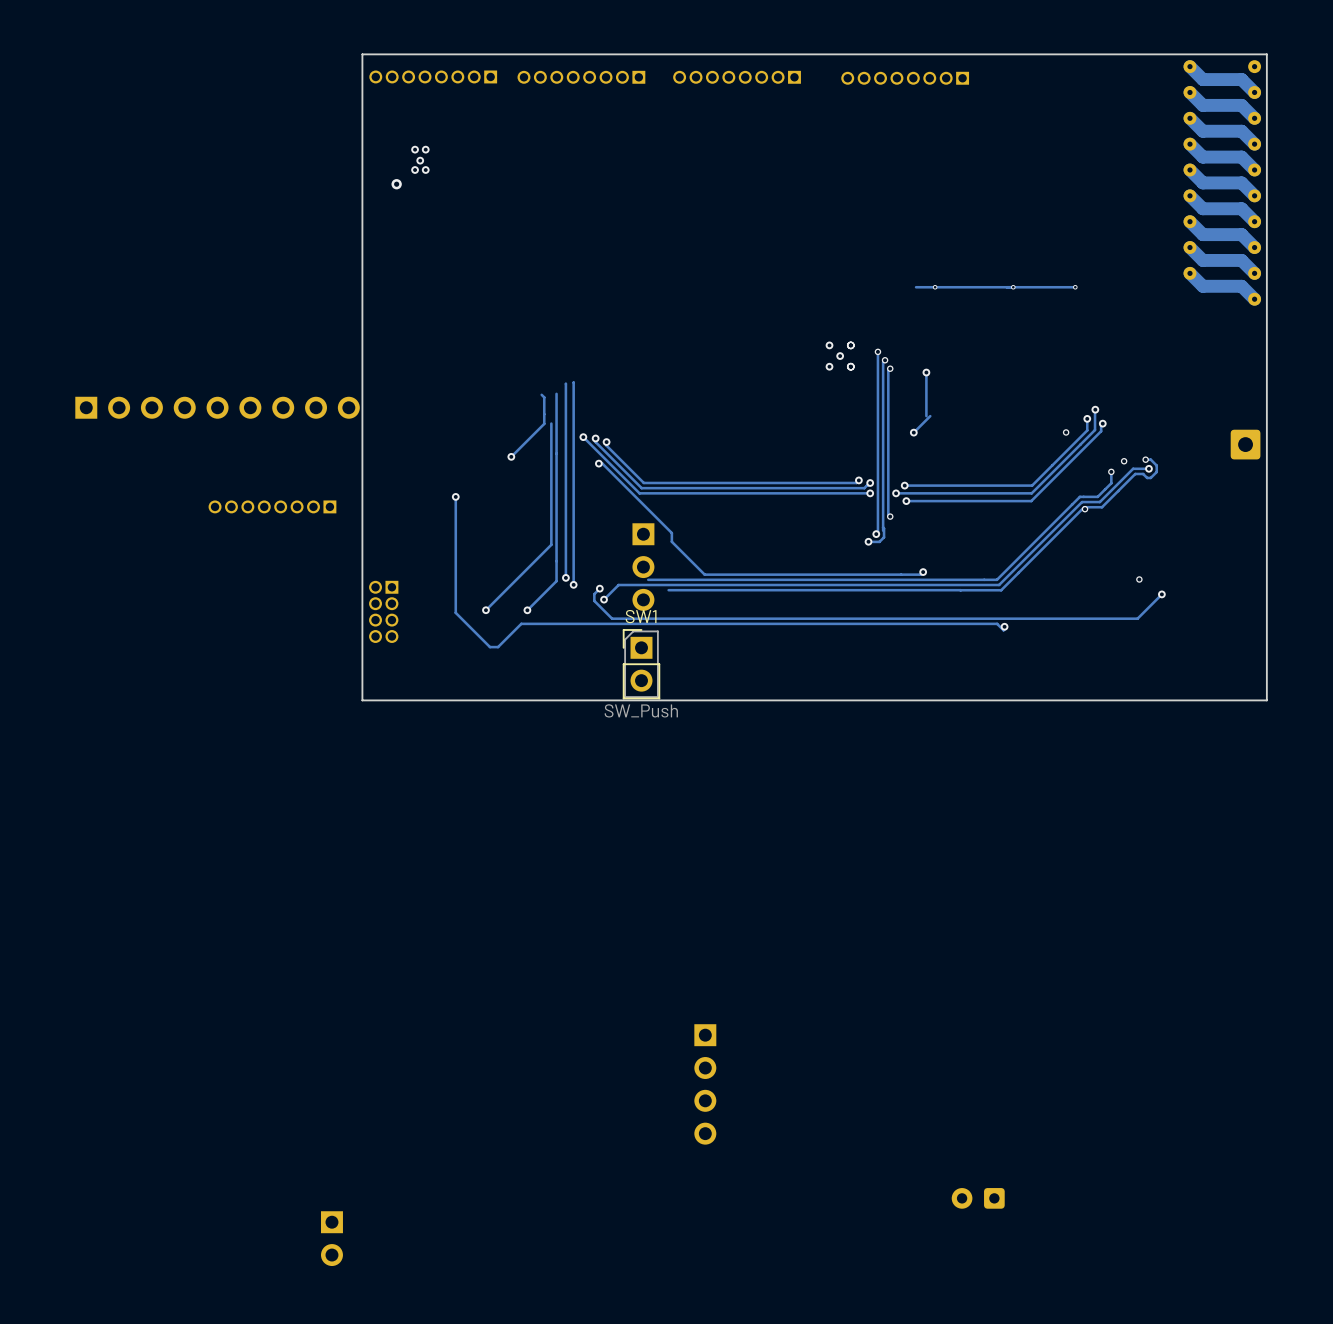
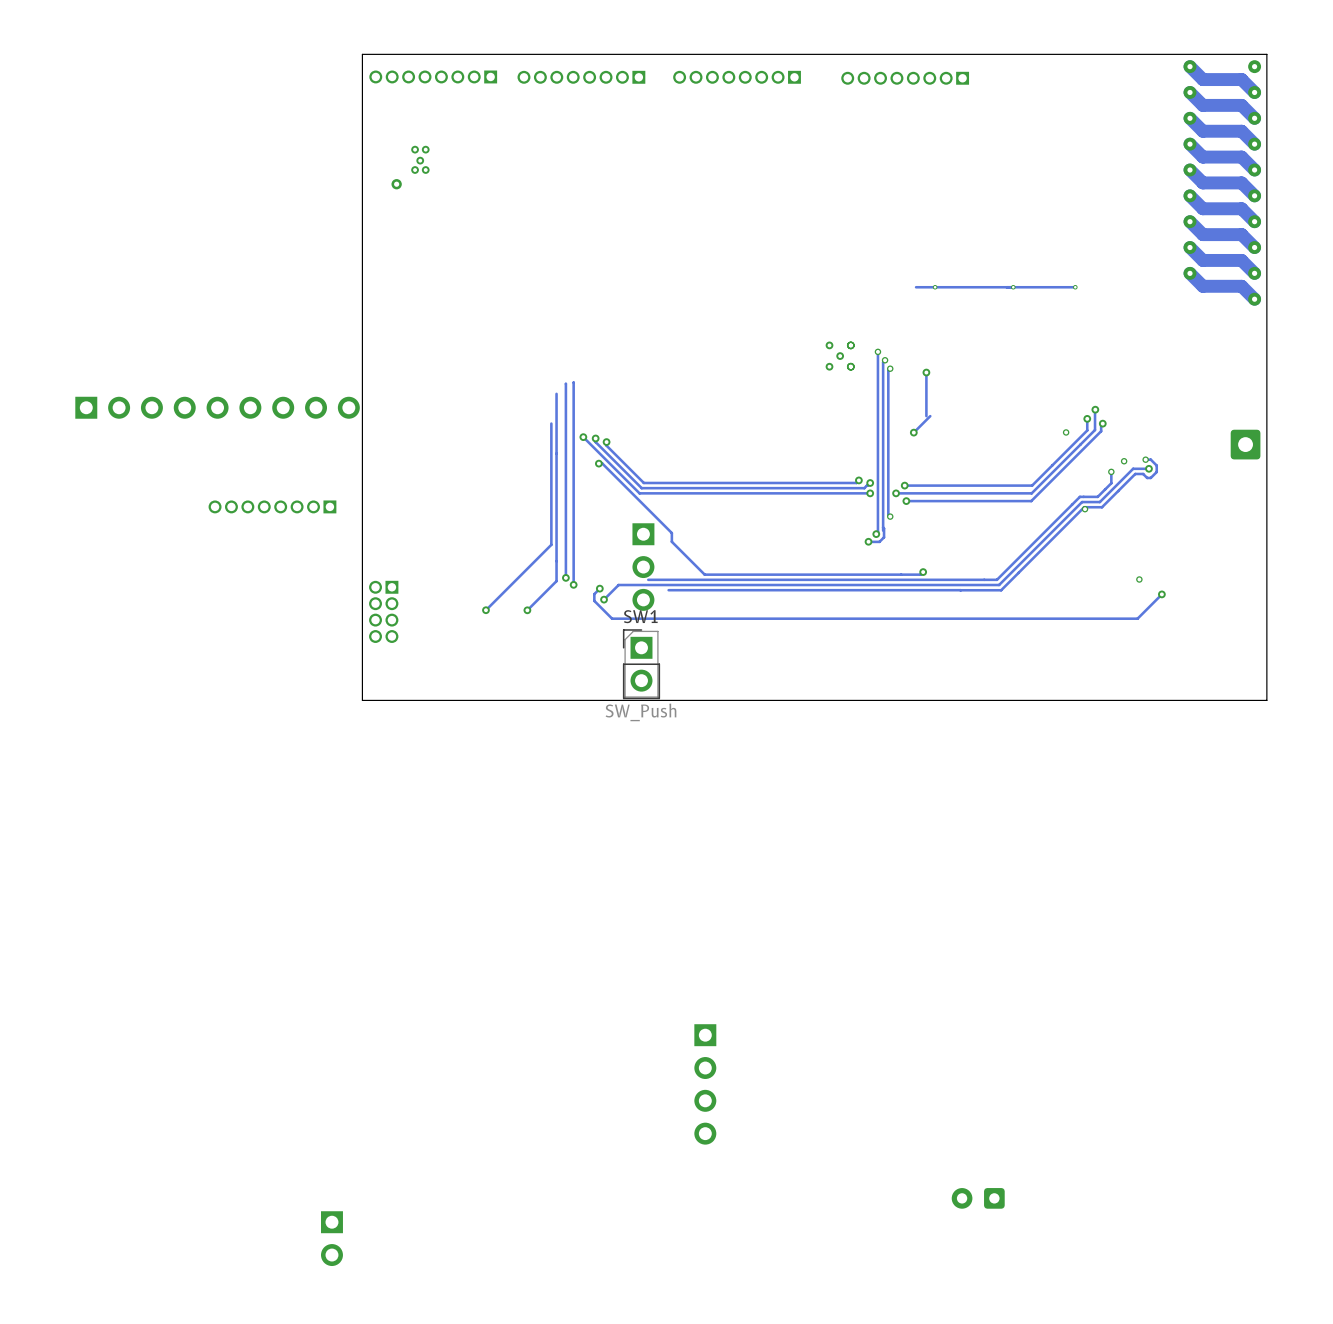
track: (541, 394) (544, 397) (544, 423) (511, 456) -> none
via: (511, 456) -> none
track: (455, 496) (455, 612) (490, 647) (498, 647) (521, 623) (997, 623) (1003, 630) (1004, 626) -> none
via: (455, 496) -> none
via: (1004, 626) -> none

